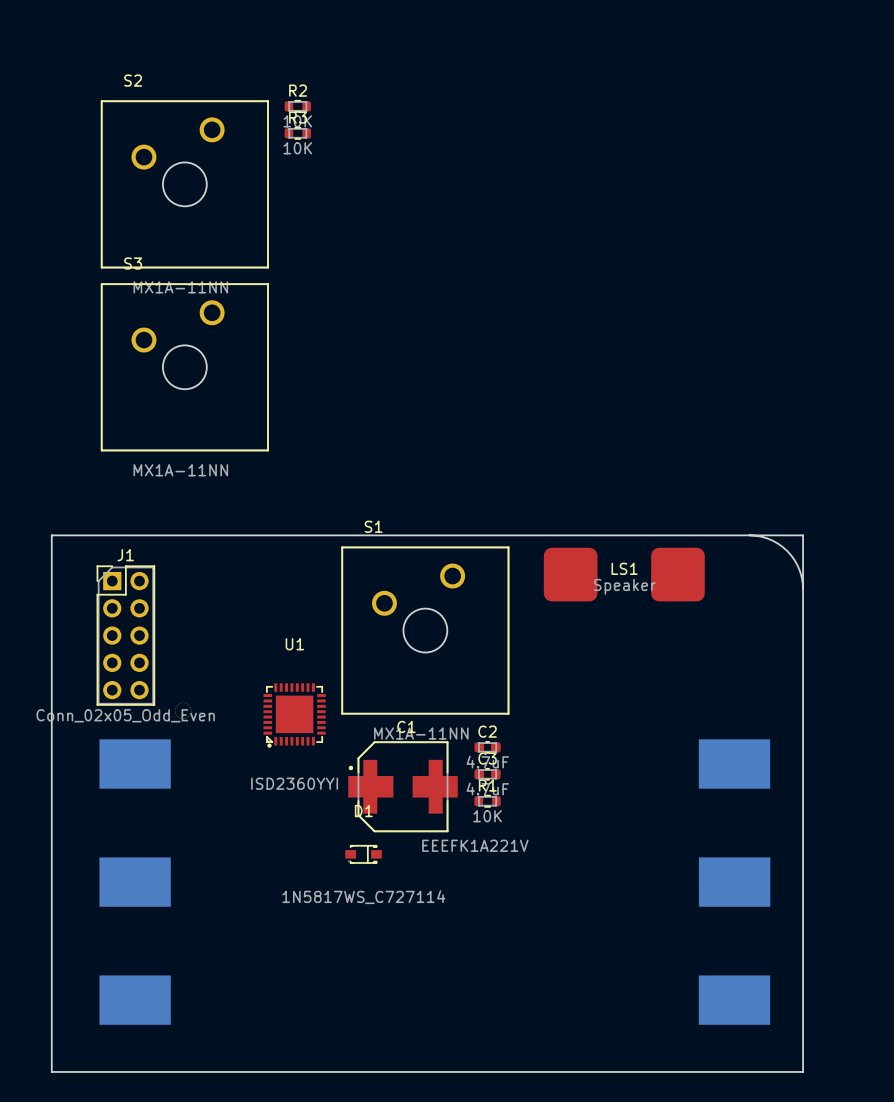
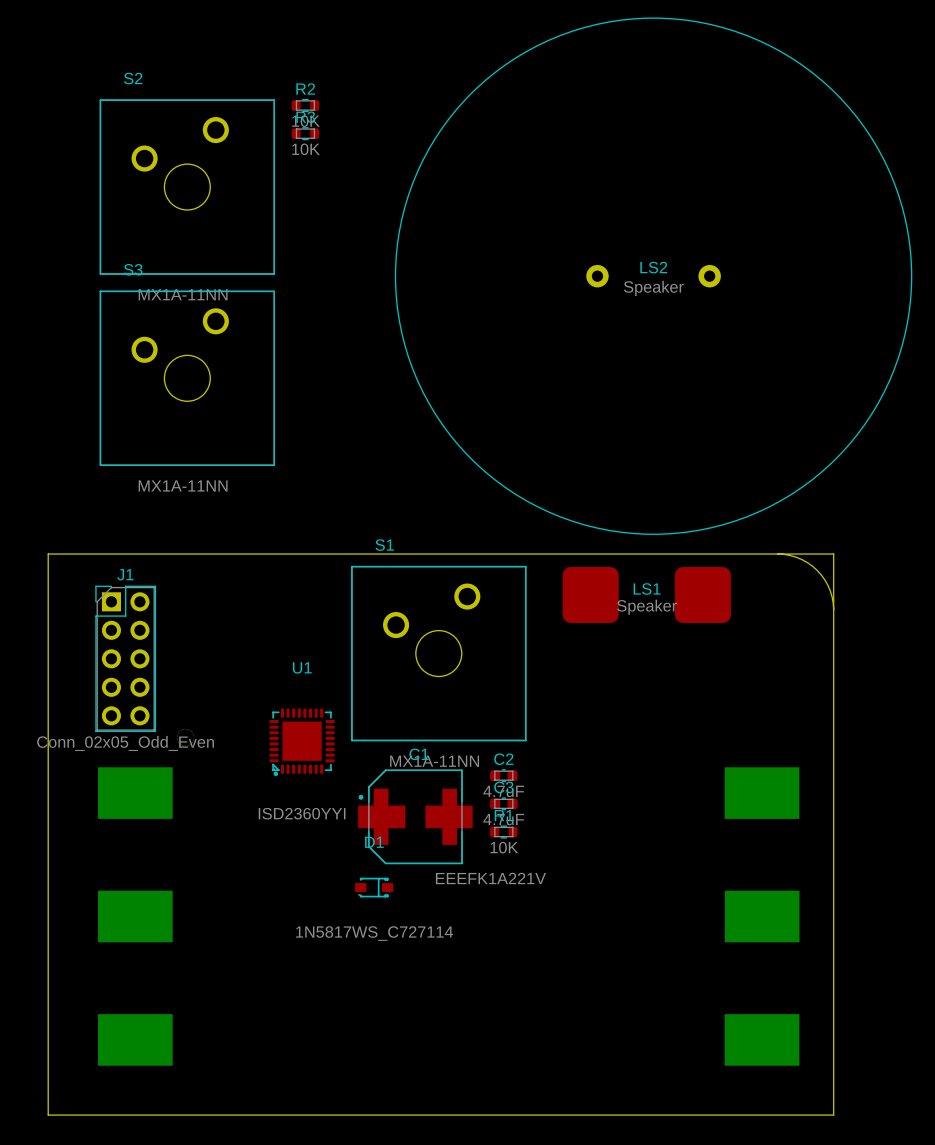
LS2: none -> Speaker (653, 276)

